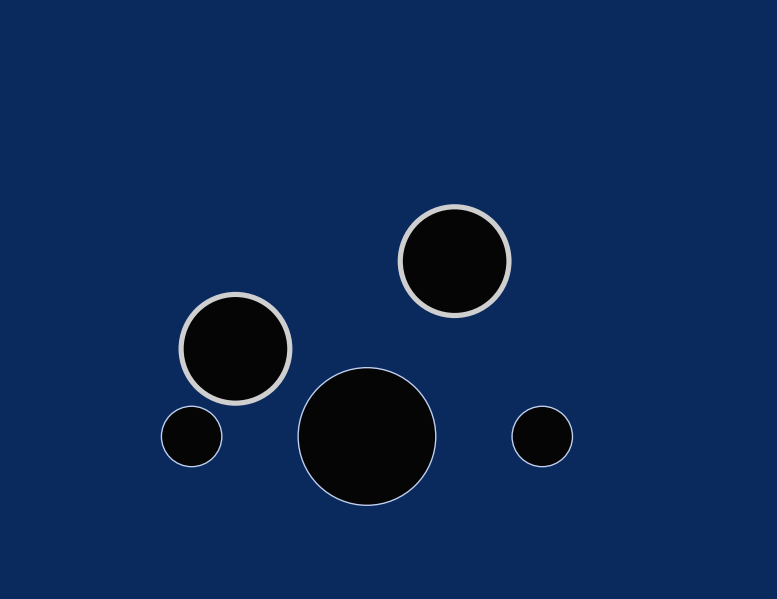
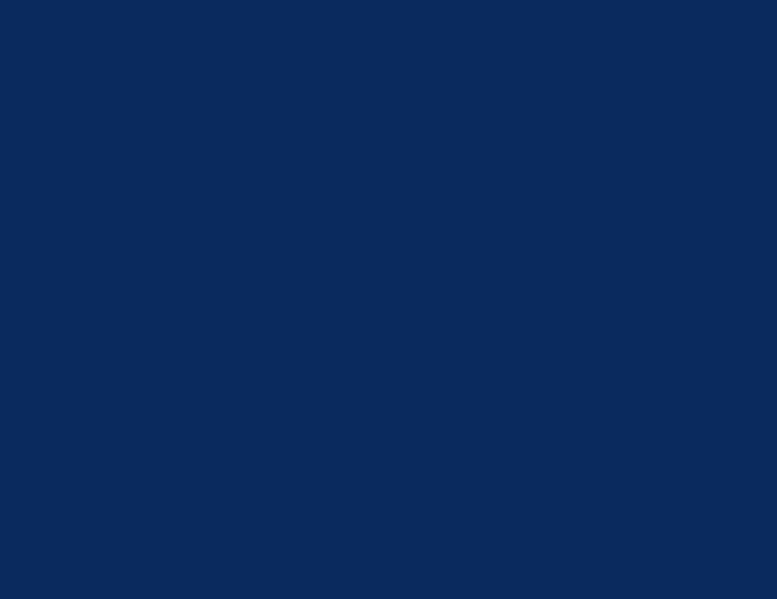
part: (366, 354) -> none

